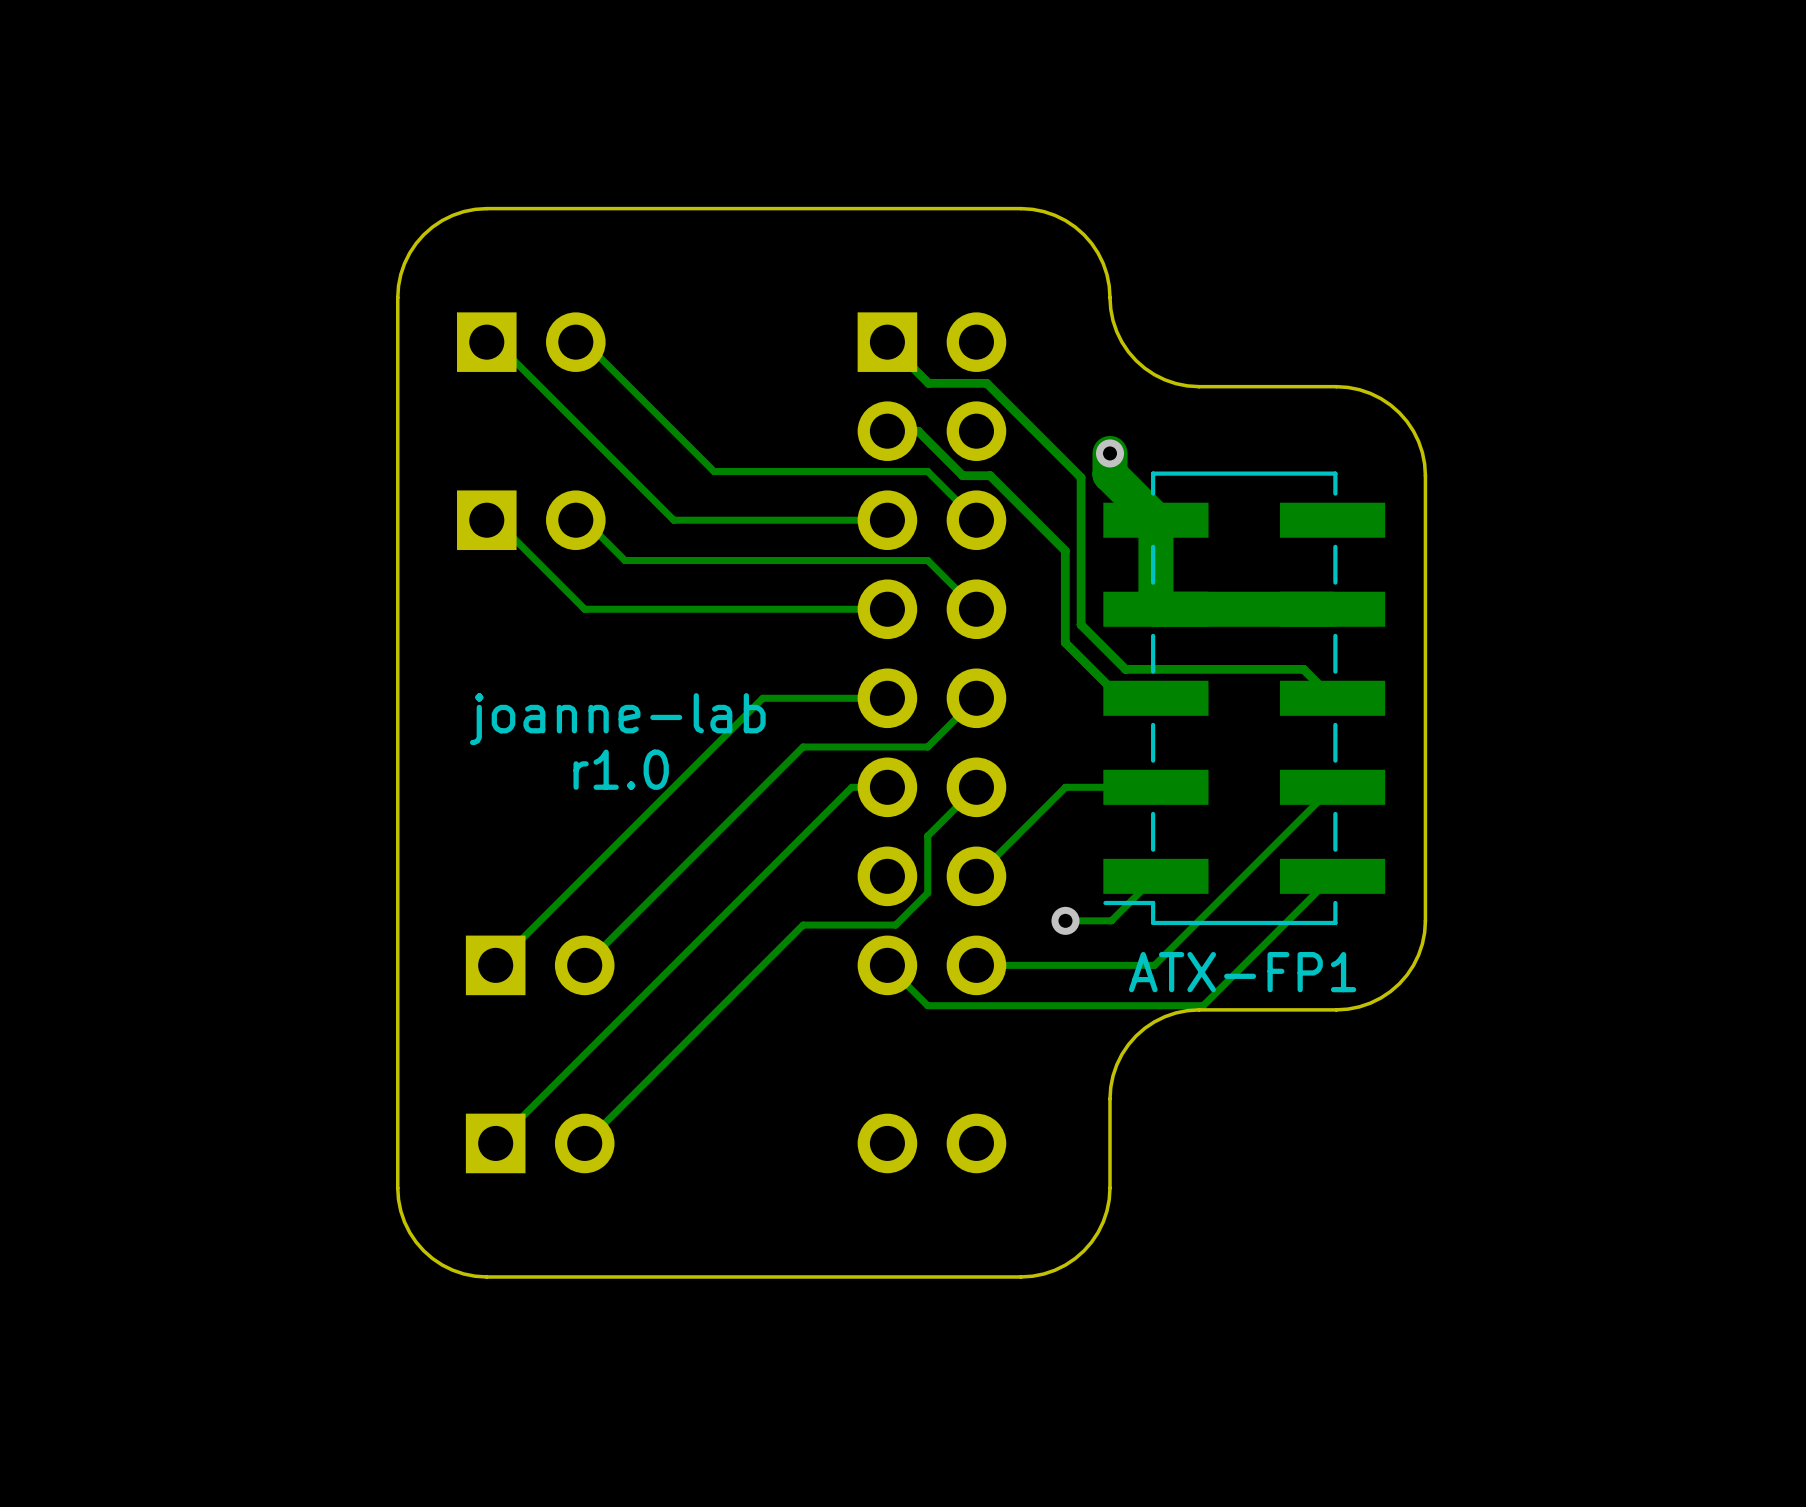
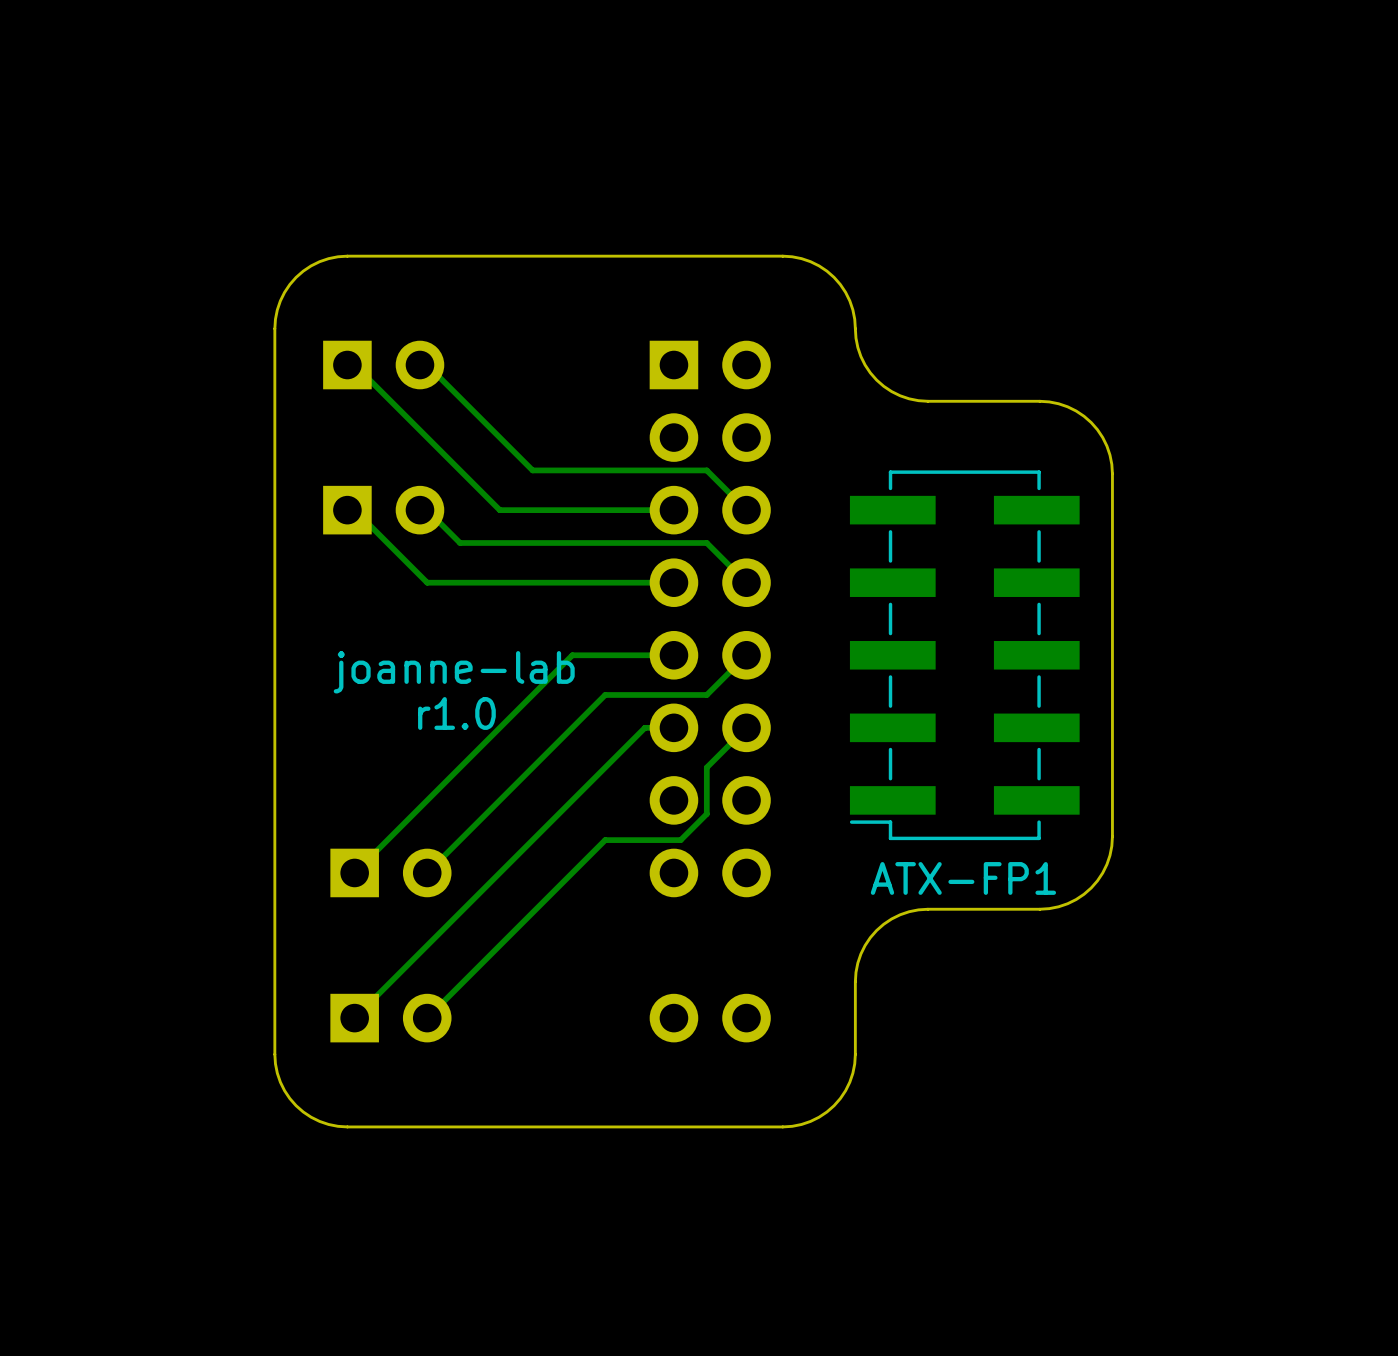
track: (887, 342) (928, 383) (986, 383) (1081, 477) (1081, 624) (1125, 669) (1303, 669) (1332, 698) -> none
track: (887, 431) (918, 431) (962, 475) (990, 475) (1065, 550) (1065, 642) (1120, 698) (1155, 698) -> none
track: (1110, 453) (1110, 474) (1155, 520) (1155, 609) (1332, 609) -> none
via: (1110, 453) -> none
track: (1155, 787) (1065, 787) (976, 876) -> none
track: (1332, 787) (1154, 965) (976, 965) -> none
track: (1155, 876) (1111, 920) (1065, 920) -> none
track: (1332, 876) (1203, 1005) (927, 1005) (887, 965) -> none
via: (1065, 920) -> none

